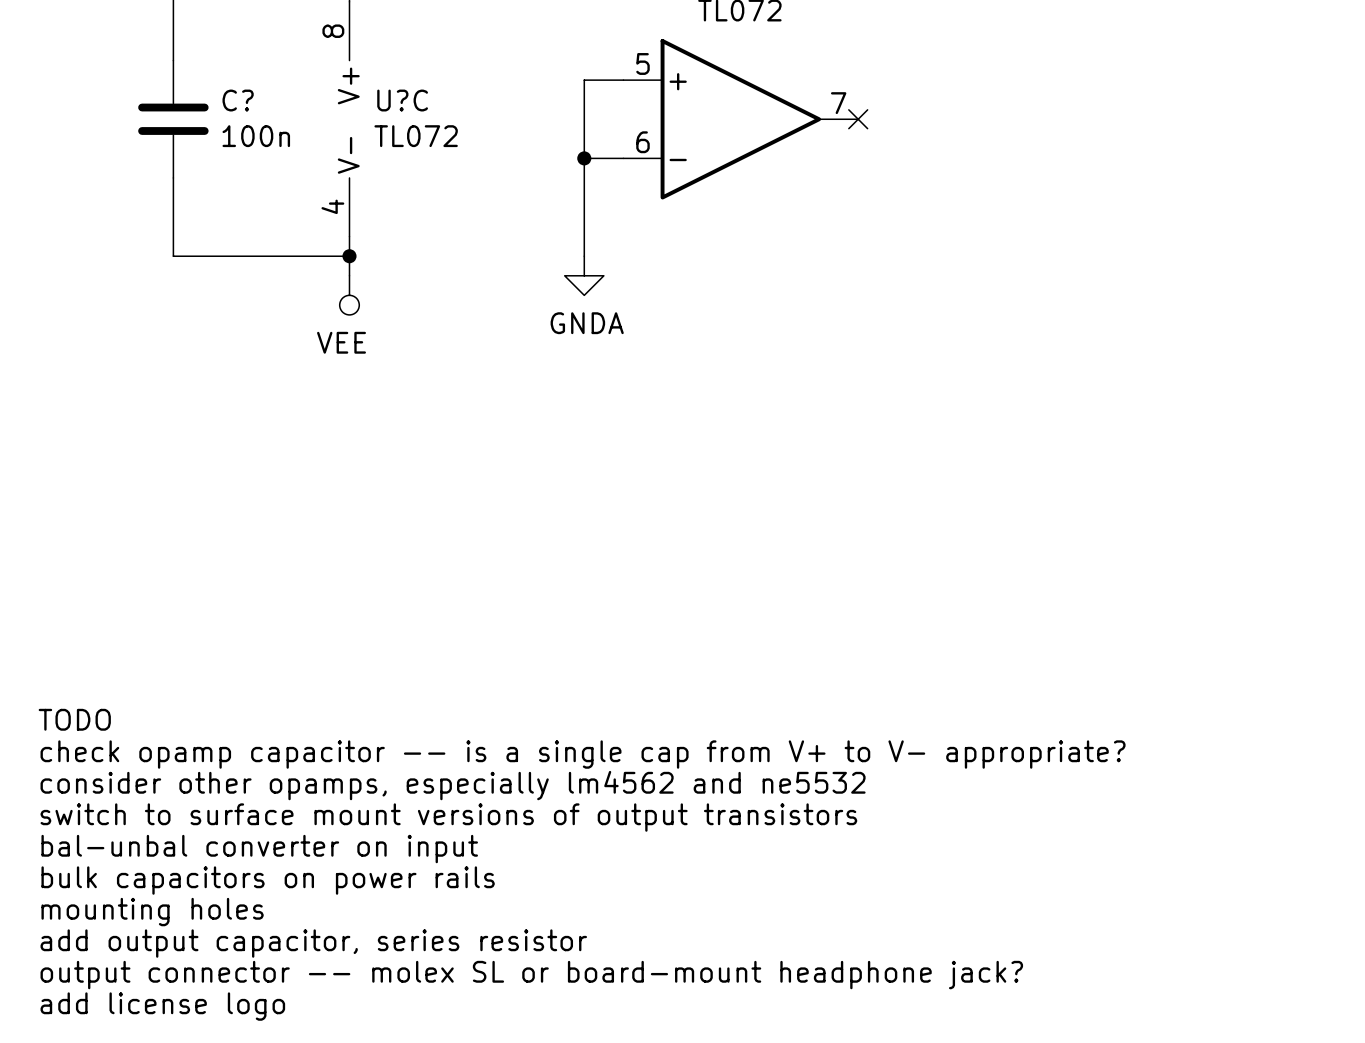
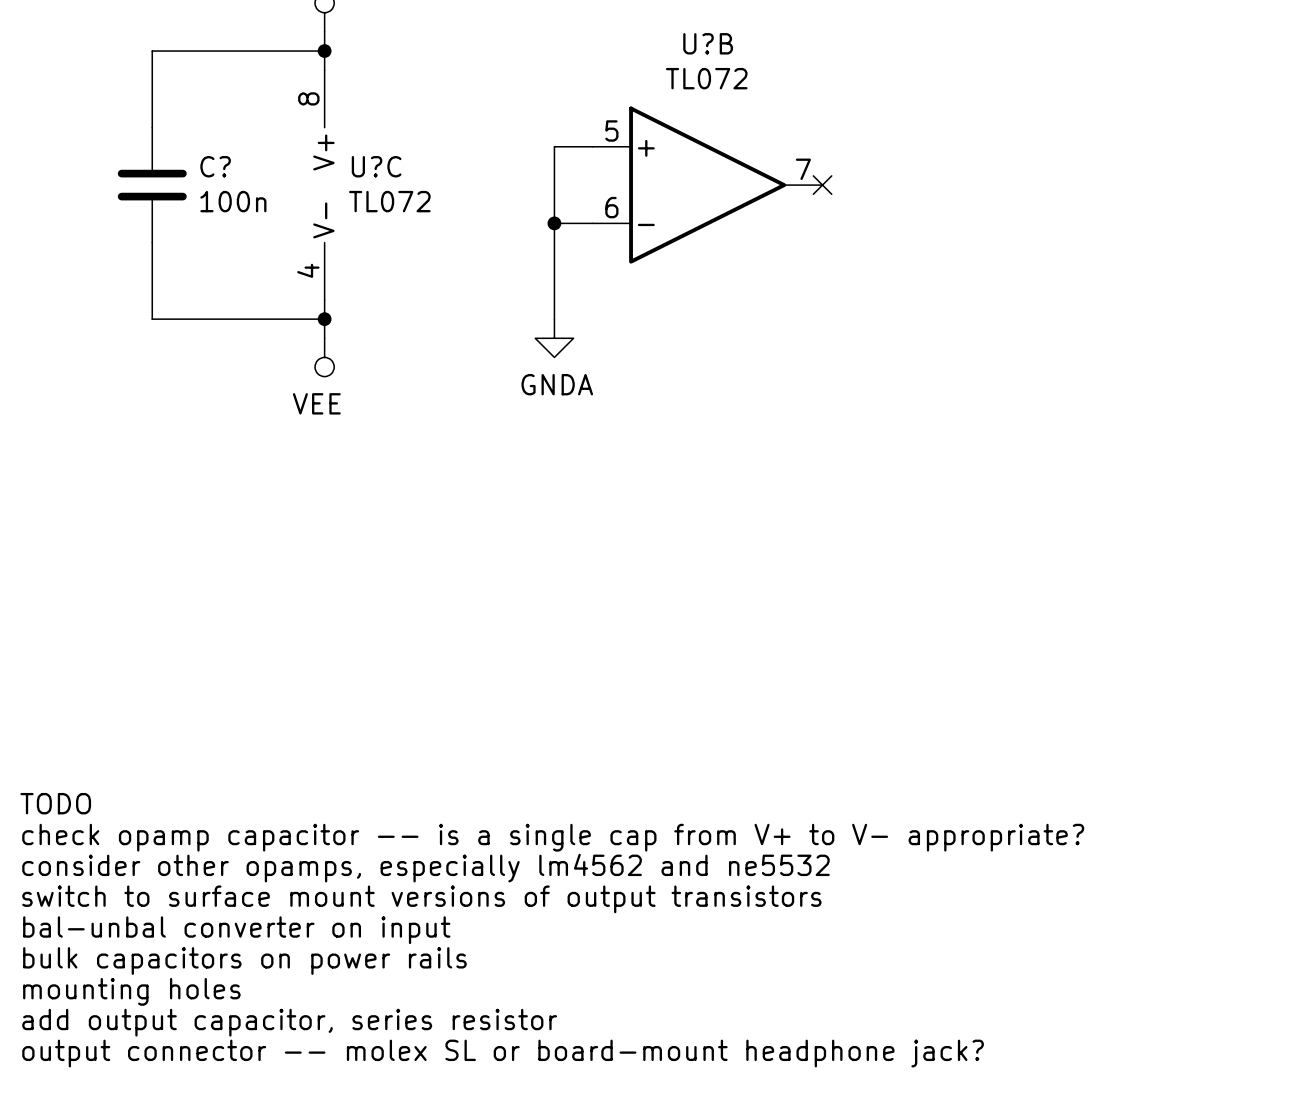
text: TODO (74, 719) -> none
text: check opamp capacitor -- is a single cap from V+ to V- appropriate? (583, 754) -> TODO (55, 803)
text: consider other opamps, especially lm4562 and ne5532 (453, 785) -> check opamp capacitor -- is a single cap from V+ to V- appropriate? (553, 837)
text: switch to surface mount versions of output transistors (448, 817) -> consider other opamps, especially lm4562 and ne5532 (425, 868)
text: bal-unbal converter on input (259, 849) -> switch to surface mount versions of output transistors (421, 899)
text: bulk capacitors on power rails (268, 880) -> bal-unbal converter on input (236, 930)
text: mounting holes (152, 912) -> bulk capacitors on power rails (244, 961)
text: add output capacitor, series resistor (313, 943) -> mounting holes (131, 991)
text: output connector -- molex SL or board-mount headphone jack? (531, 975) -> add output capacitor, series resistor (289, 1022)
text: add license logo (162, 1006) -> output connector -- molex SL or board-mount headphone jack? (503, 1053)

